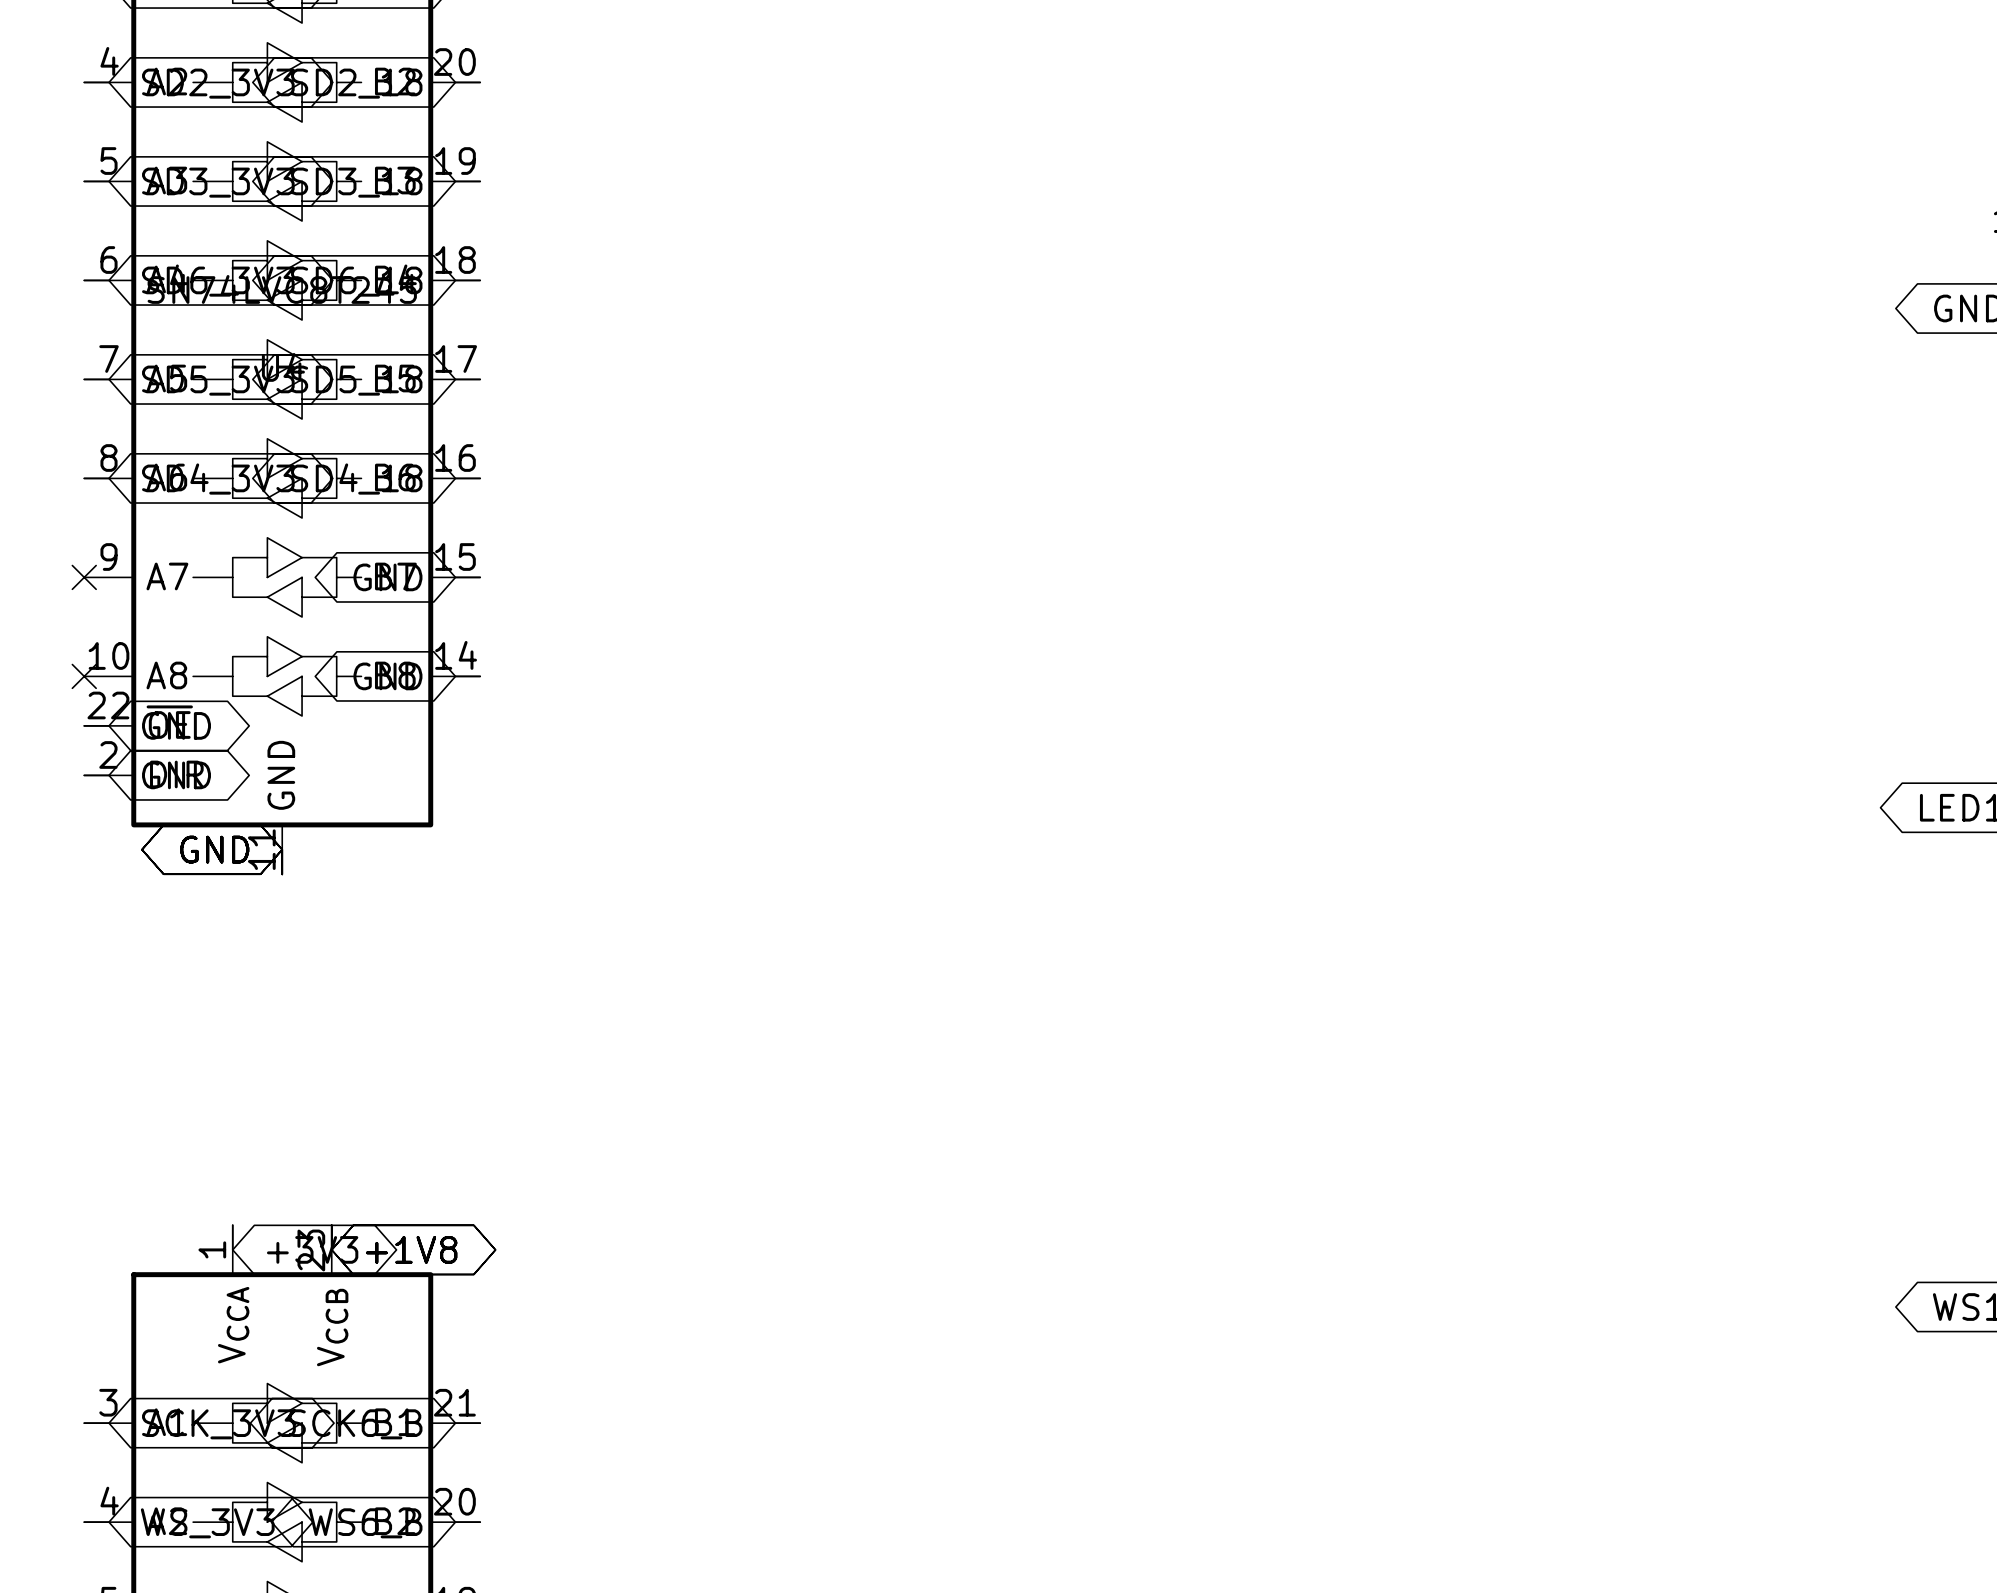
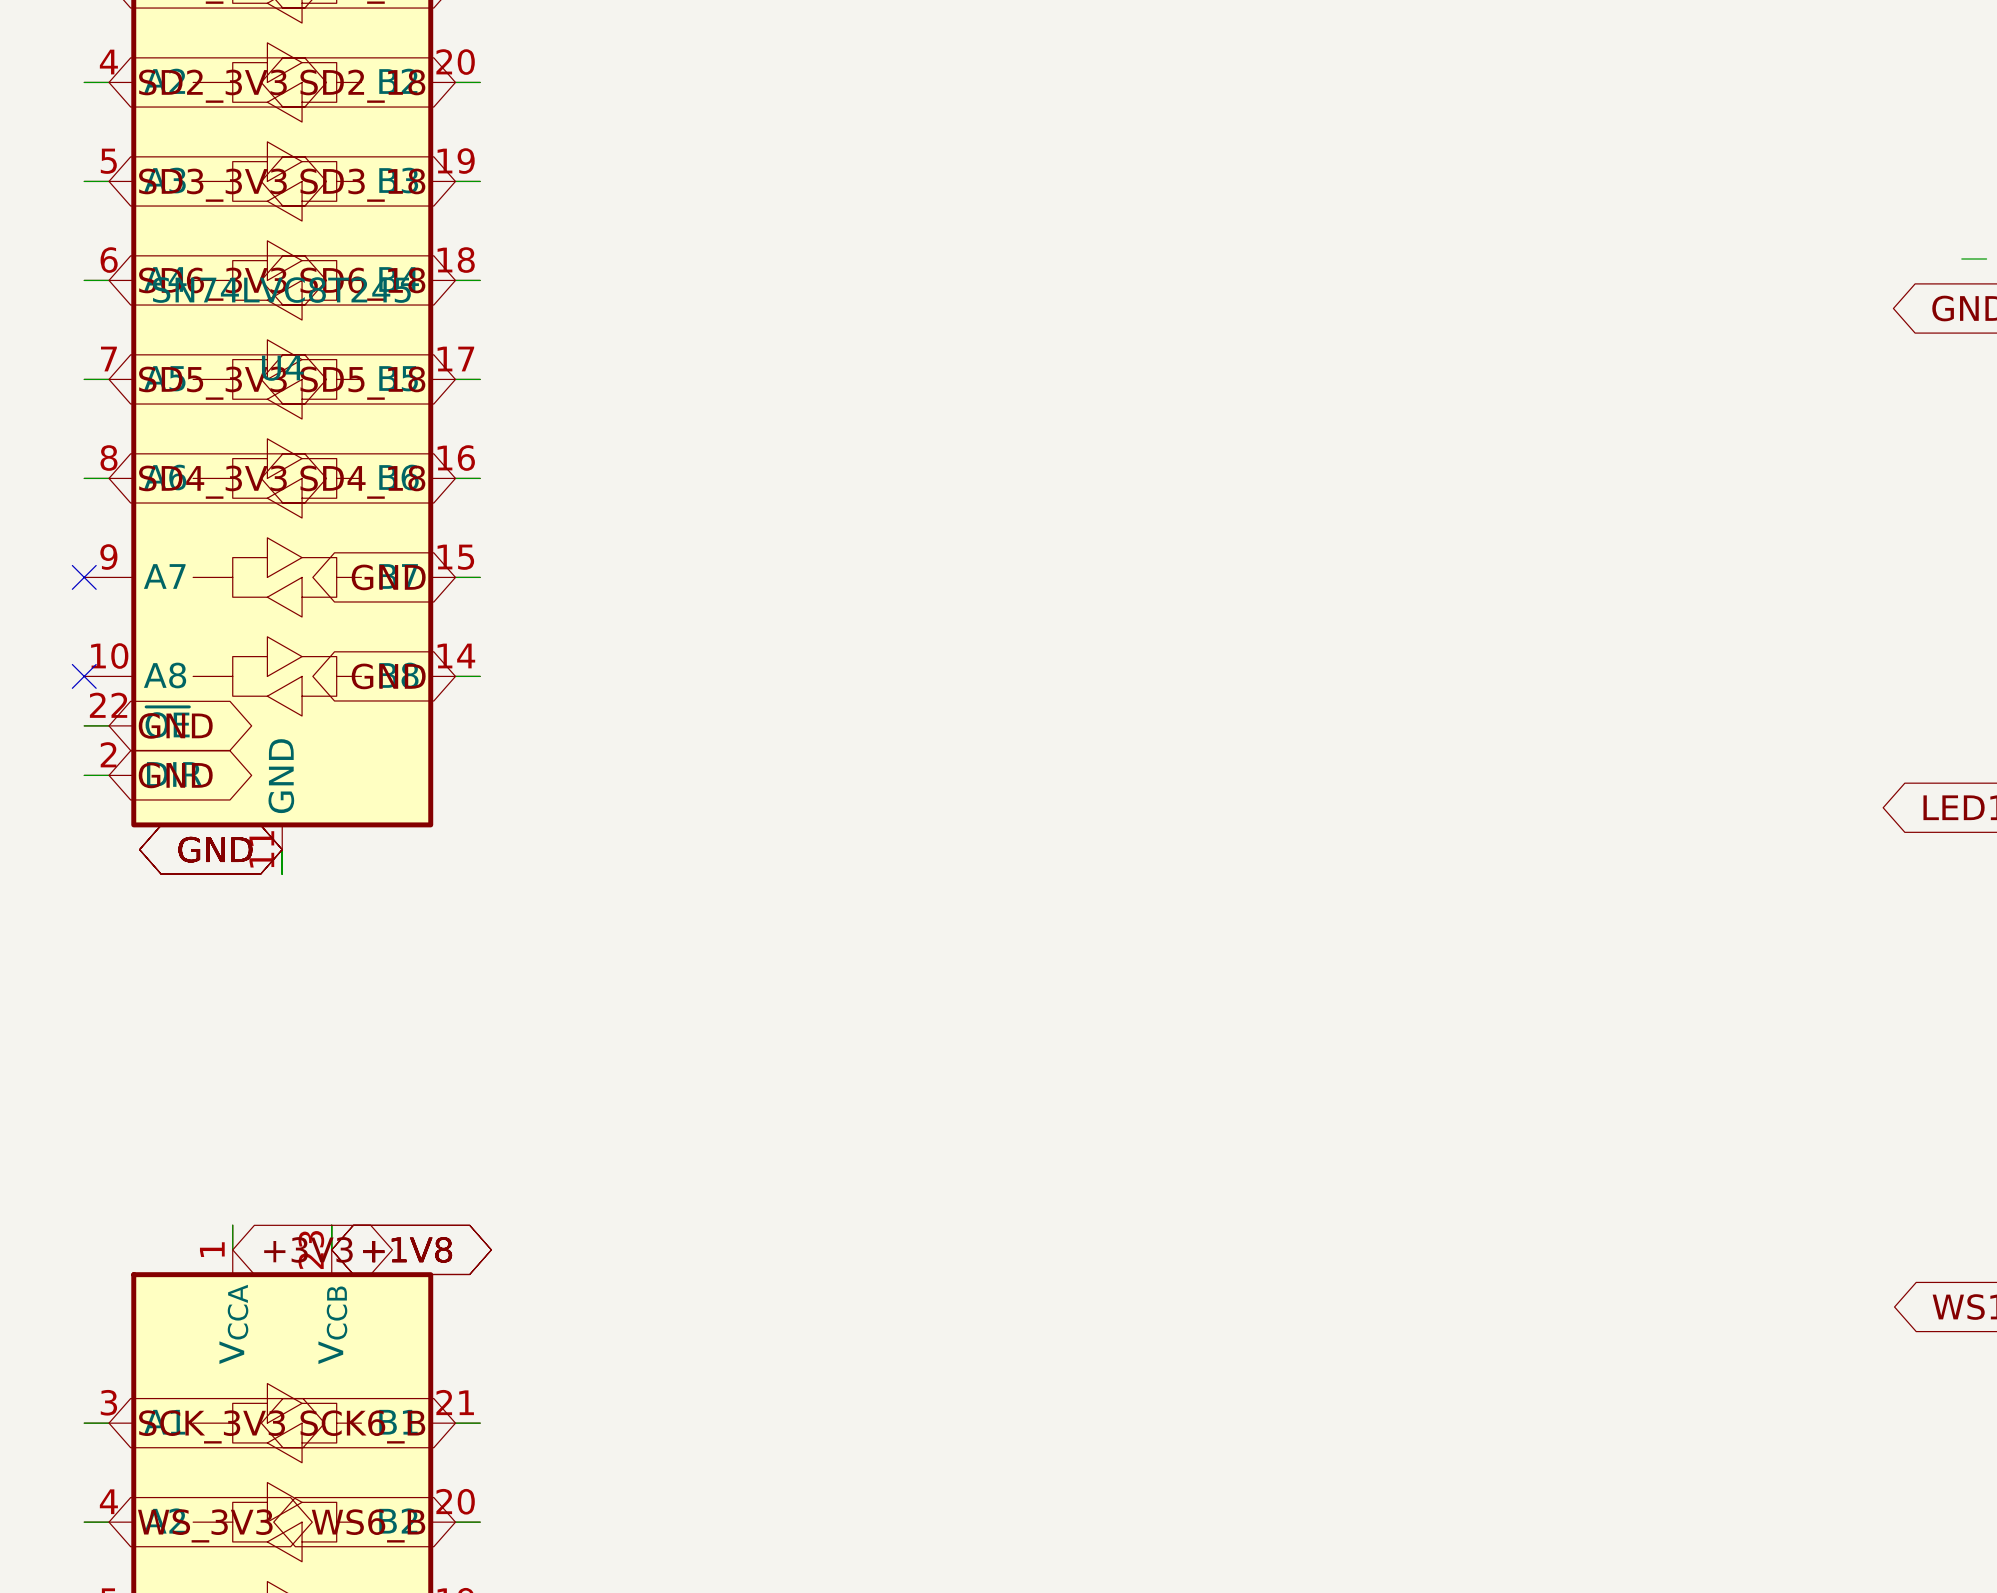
wire: none -> (1961, 259) (1986, 259)

